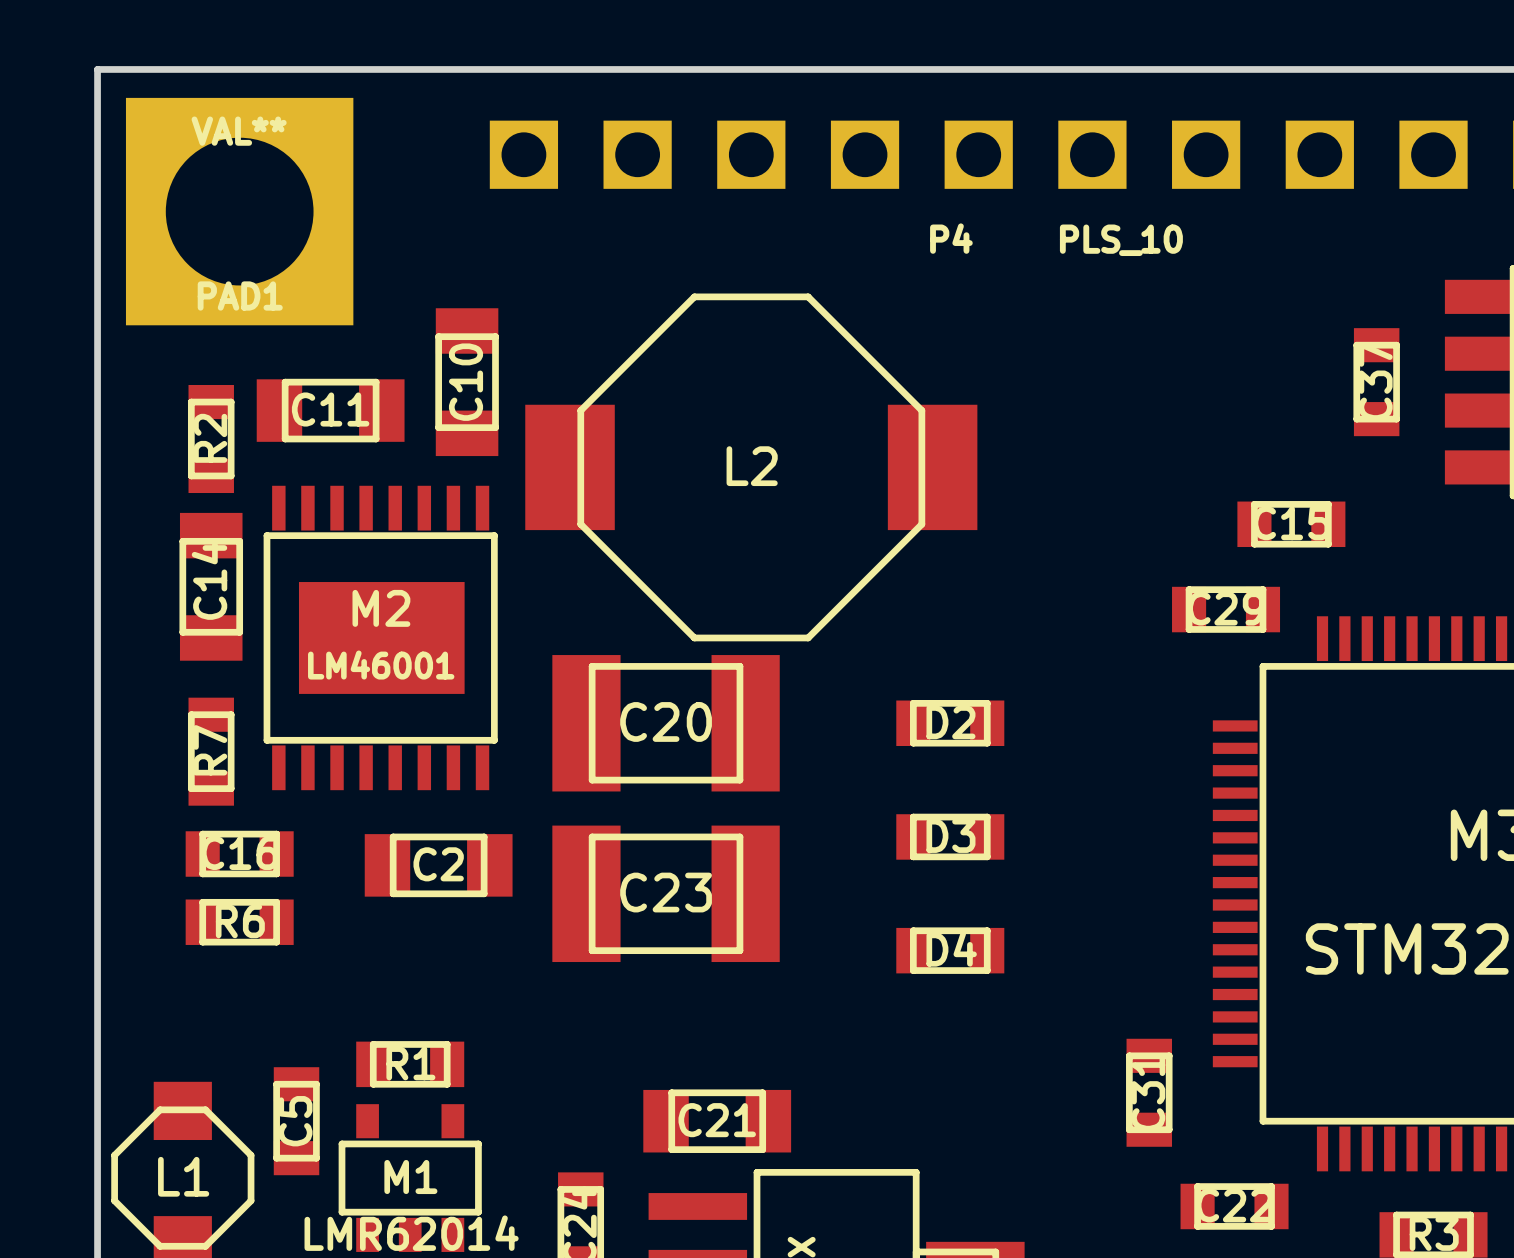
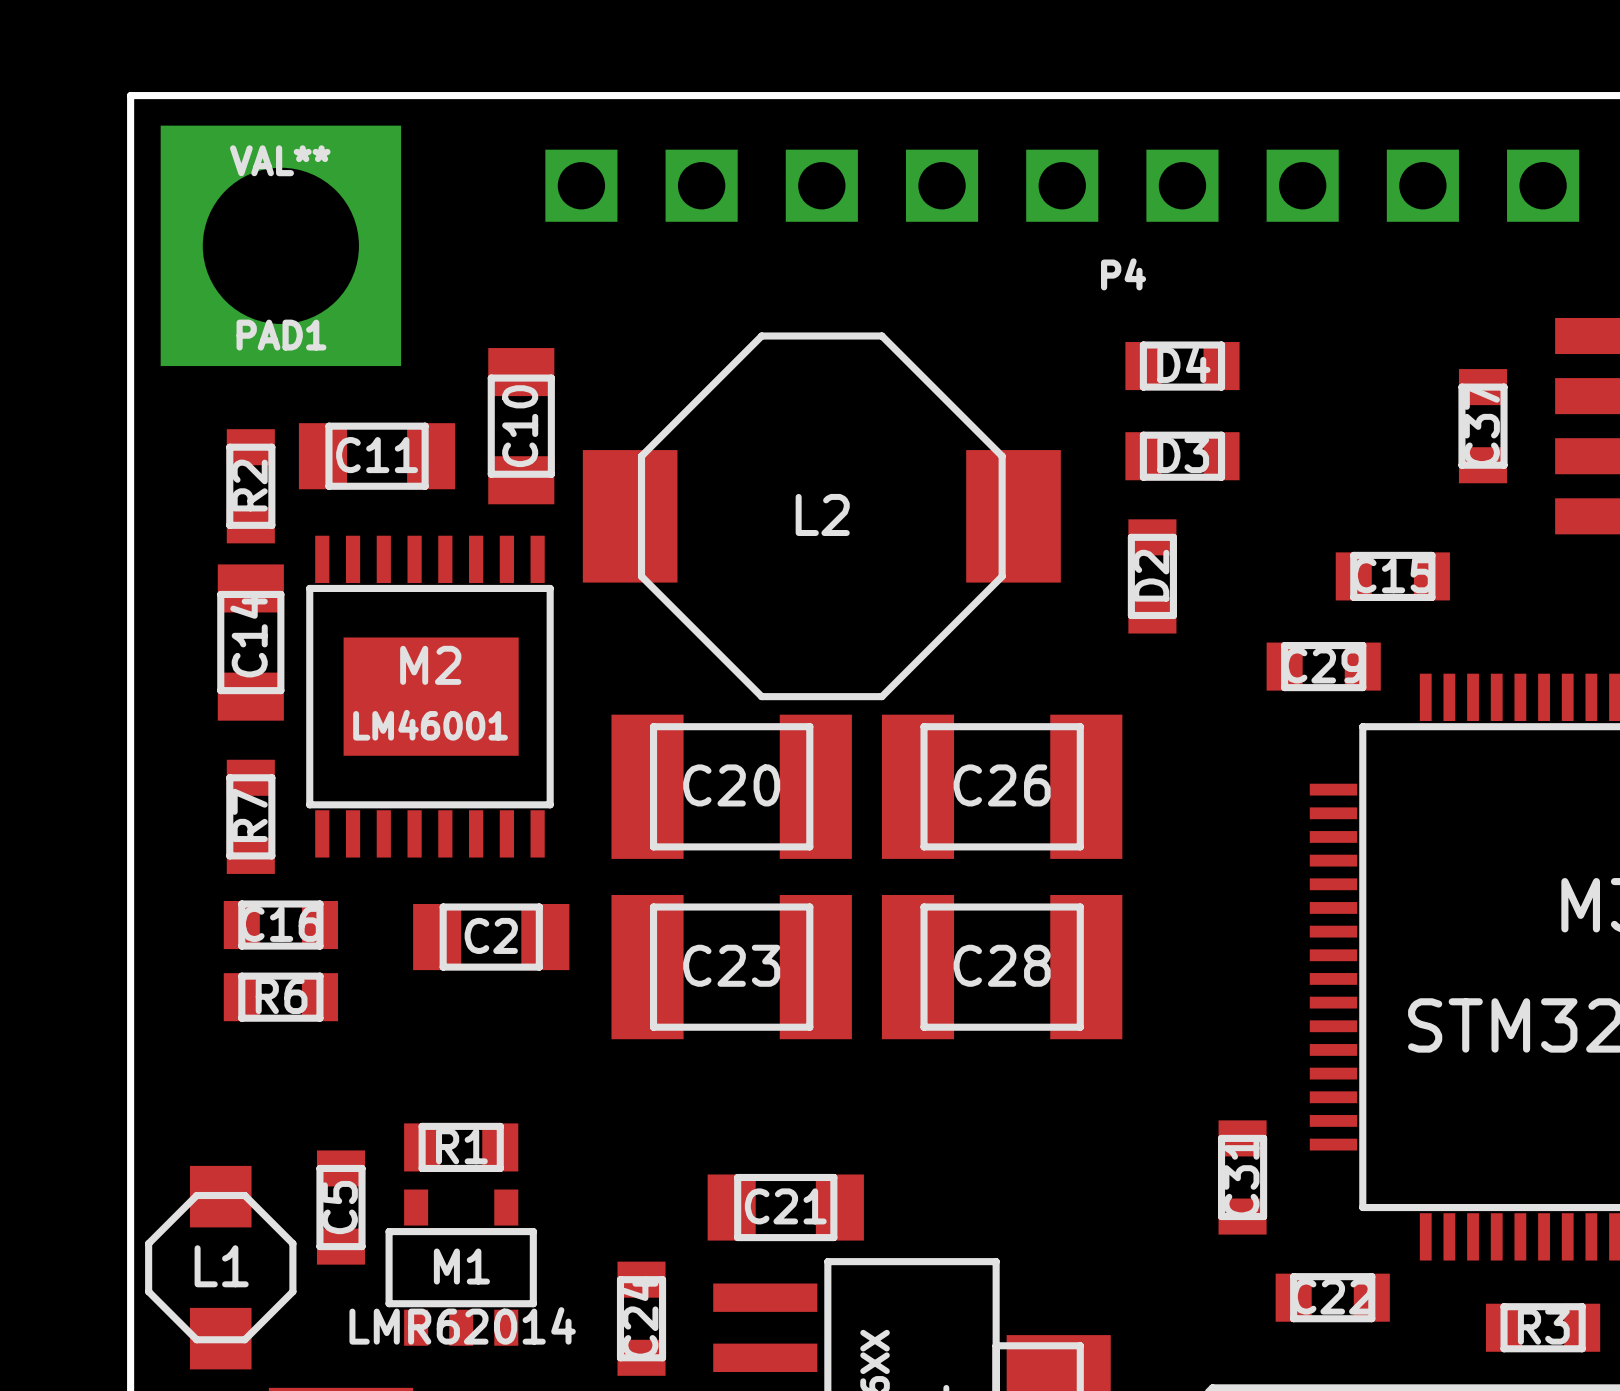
P4 name position: P4 (951, 238) -> P4 (1123, 274)
P4 value: PLS_10 (1121, 240) -> none
C26: none -> (1002, 786)
D2 rotation: 0° (950, 723) -> 90° clockwise (1152, 576)
D2 position: (950, 723) -> (1152, 576)
D3 position: (950, 836) -> (1182, 456)
C28: none -> (1002, 967)
D4 position: (950, 950) -> (1182, 366)

